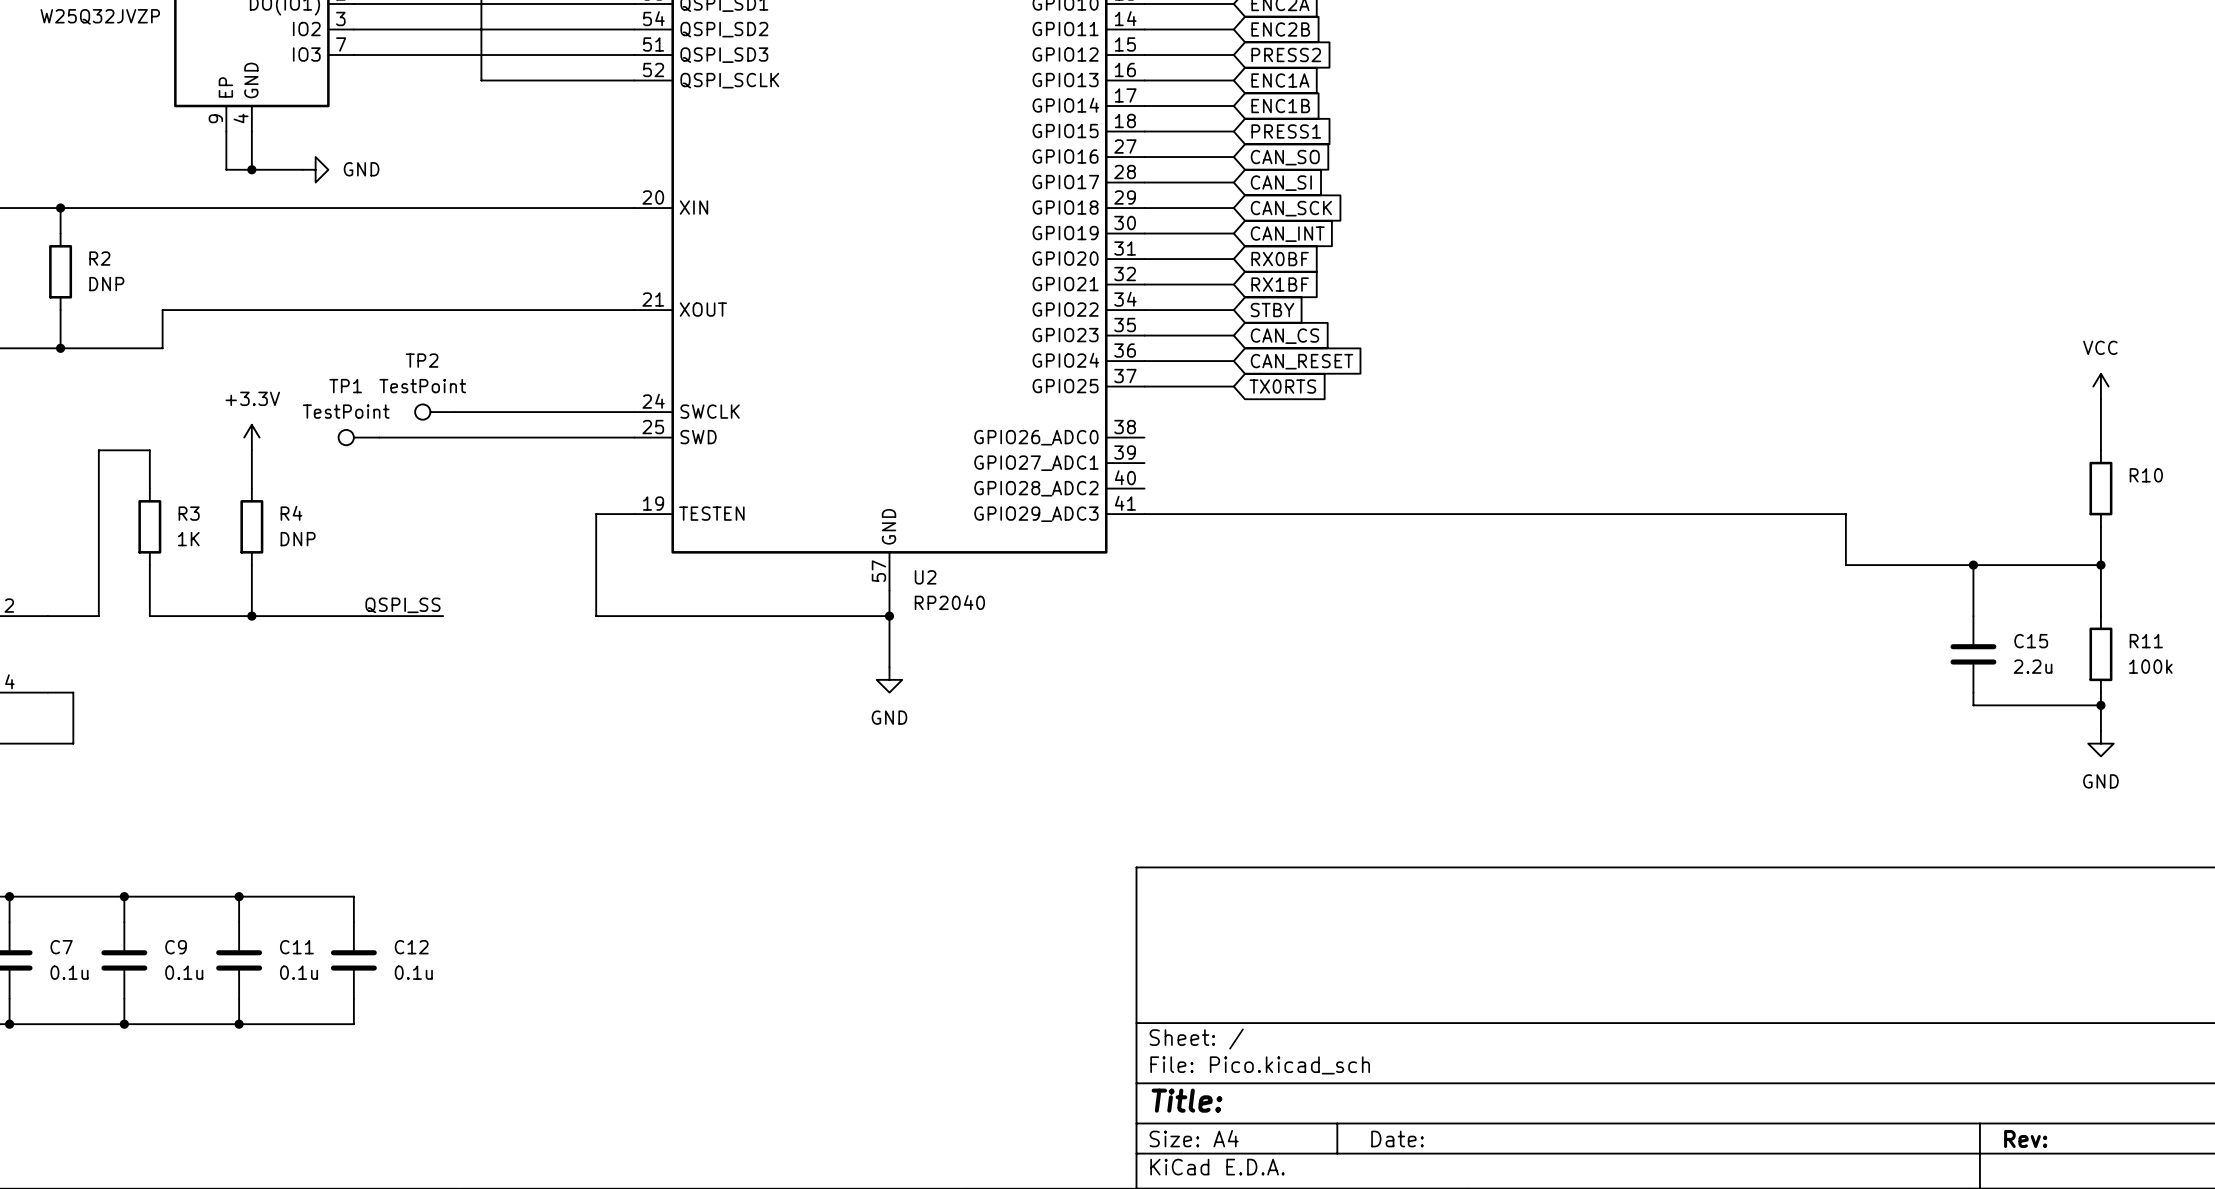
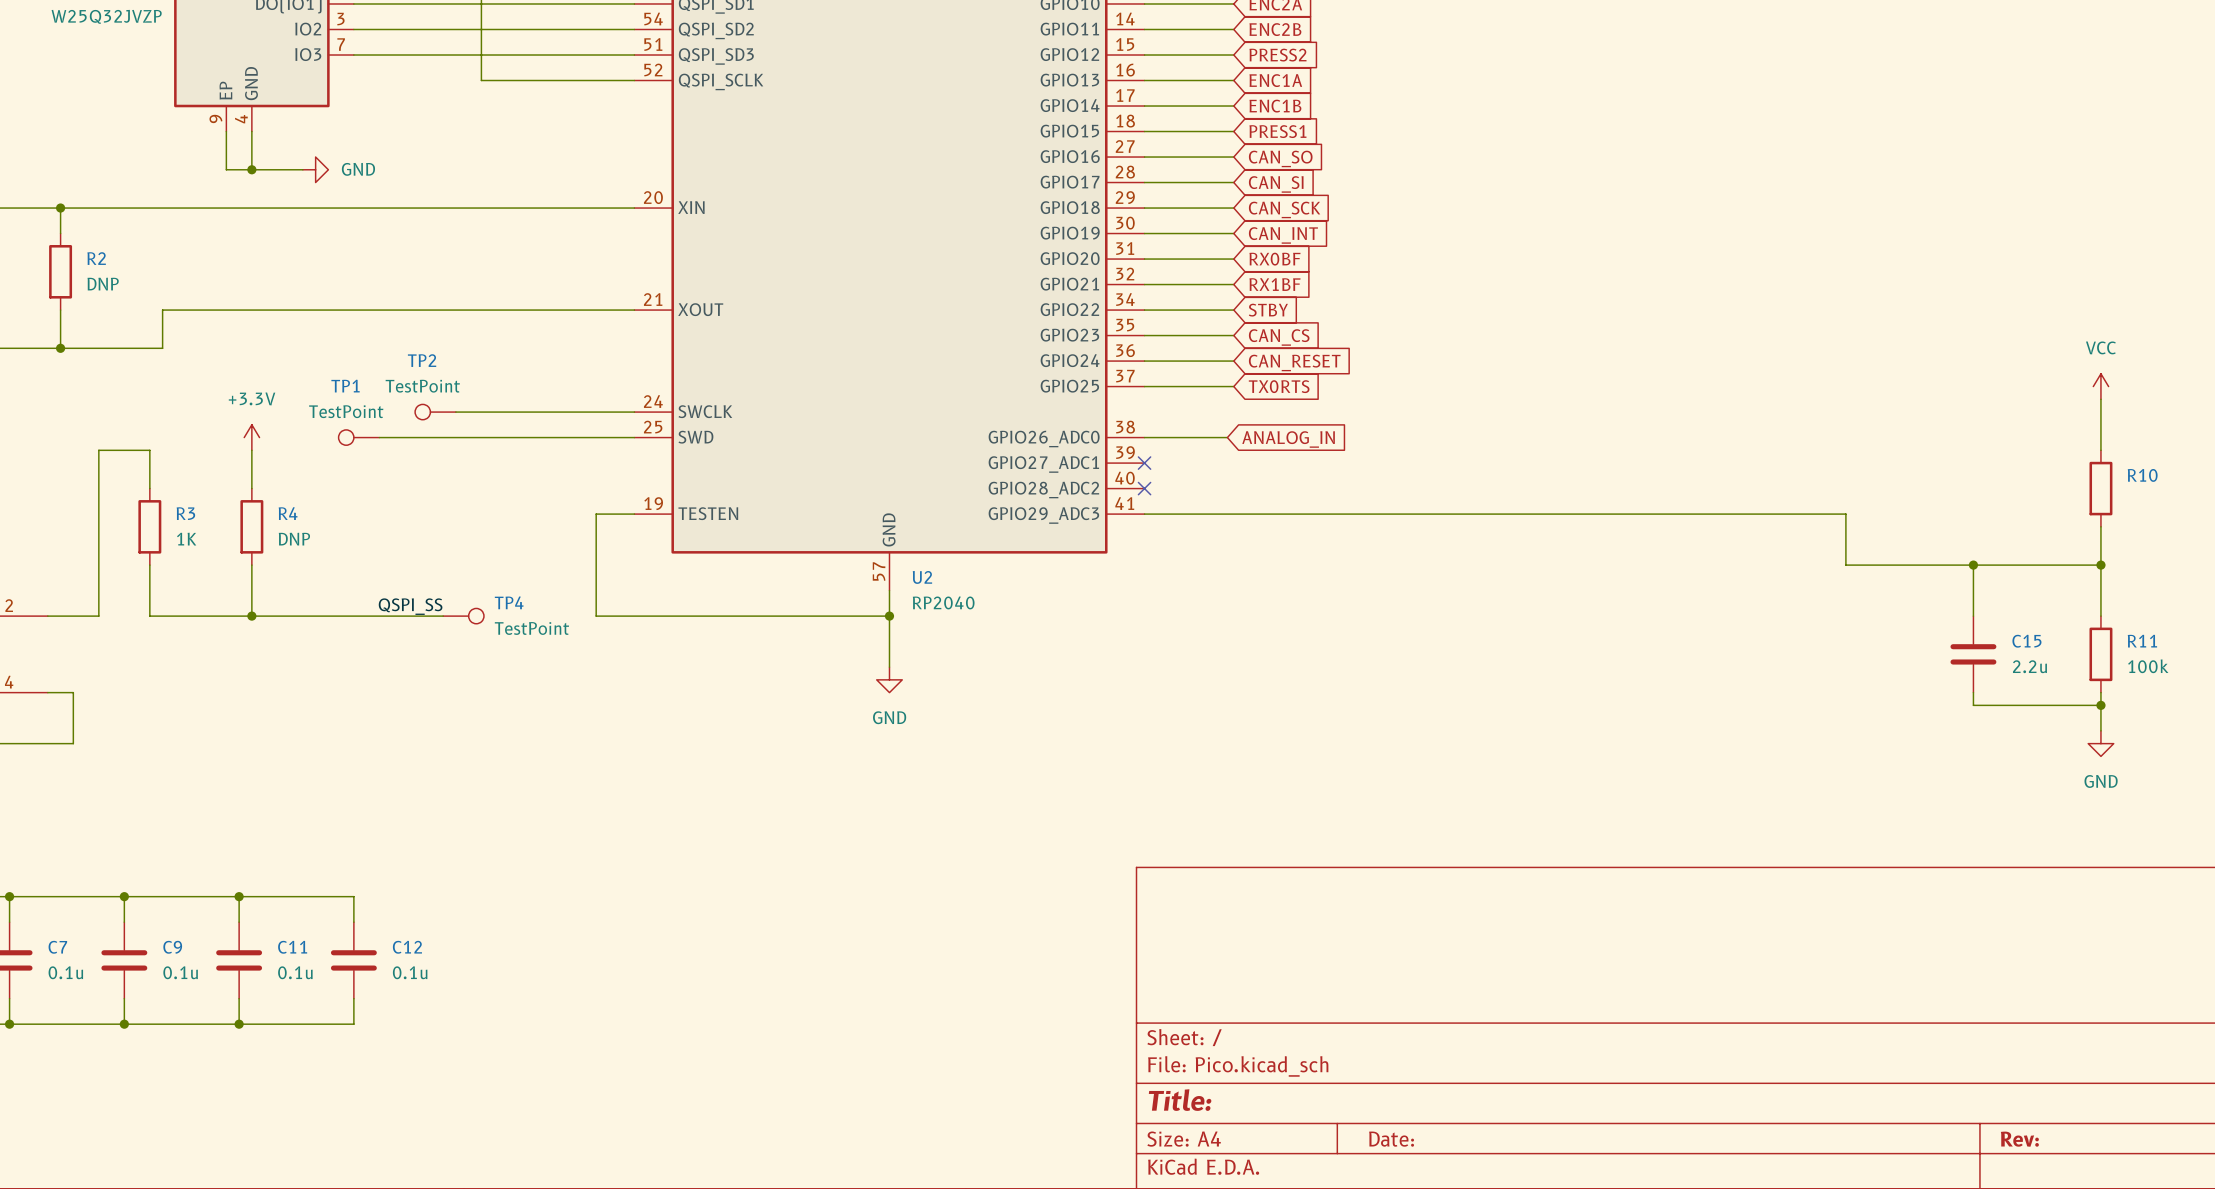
wire: none -> (1144, 437) (1227, 437)
global label: none -> ANALOG_IN (1288, 439)
no-connect mark: none -> (1144, 463)
no-connect mark: none -> (1144, 488)
TP4: none -> TestPoint (463, 616)

